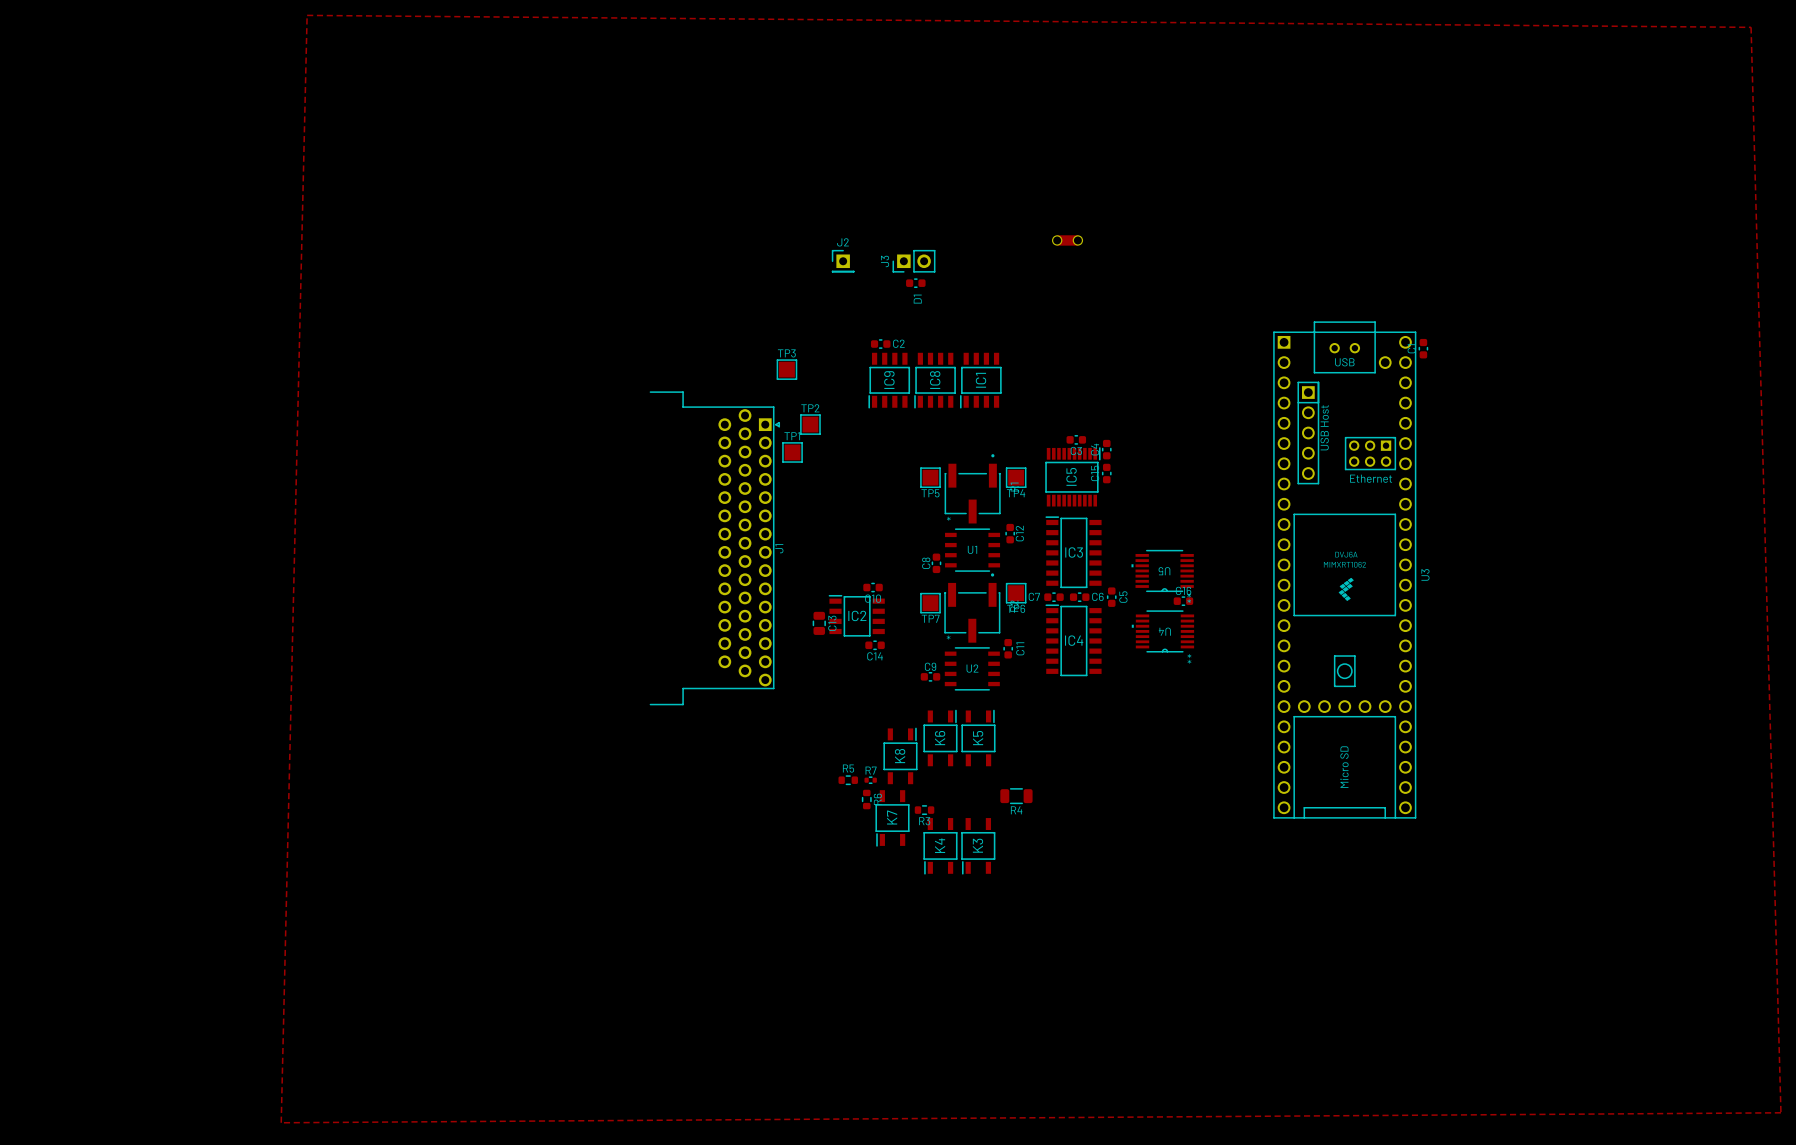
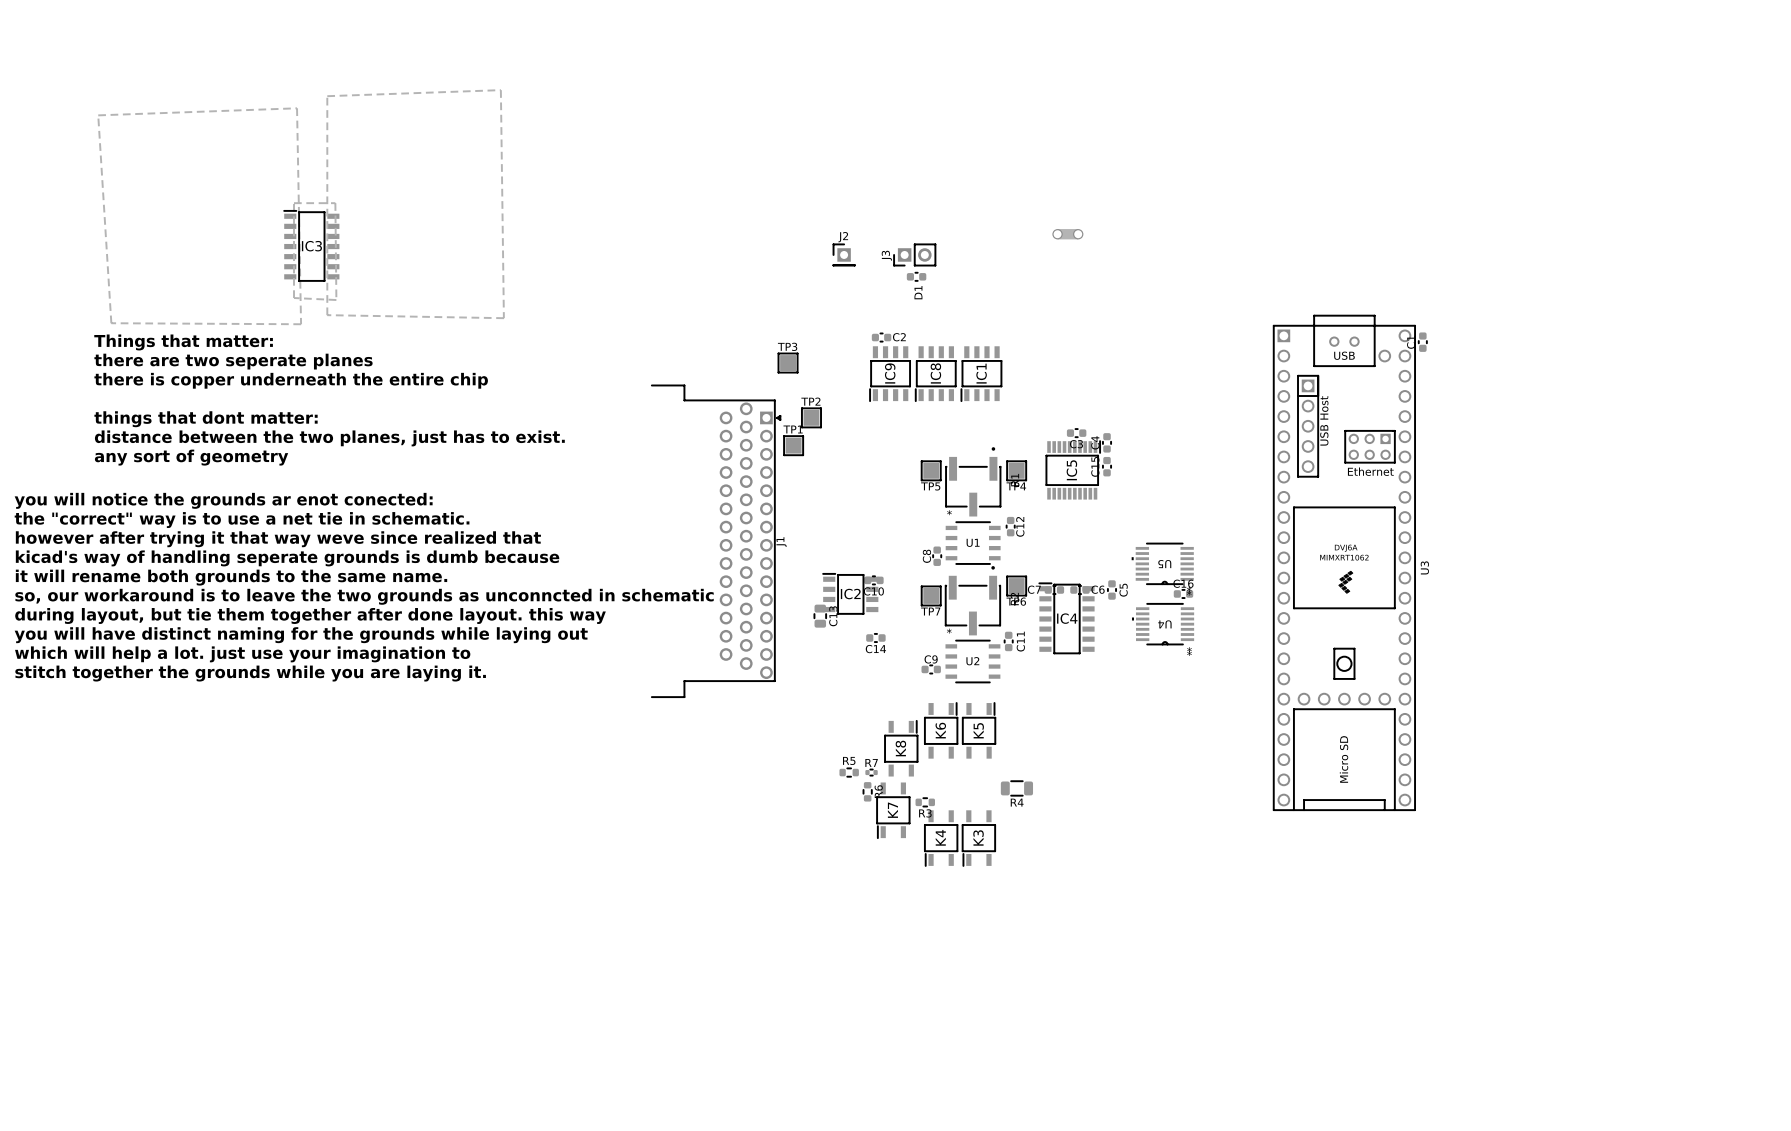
zone outline: (307, 15) (1751, 27) (1780, 1112) (281, 1122) (307, 15) -> none
zone outline: none -> (500, 90) (327, 96) (327, 315) (503, 318) (500, 90)
zone outline: none -> (297, 108) (98, 115) (111, 323) (301, 324) (297, 108)
zone outline: none -> (294, 203) (335, 203) (336, 300) (294, 298) (294, 203)
text: none -> Things that matter: (183, 342)
text: none -> there are two seperate planes (233, 361)
text: none -> there is copper underneath the entire chip (291, 380)
text: none -> things that dont matter: (206, 419)
text: none -> distance between the two planes, just has to exist. (329, 438)
text: none -> any sort of geometry (191, 457)
text: none -> you will notice the grounds ar enot conected: (223, 500)
text: none -> the "correct" way is to use a net tie in schematic. (242, 520)
text: none -> however after trying it that way weve since realized that (278, 539)
IC3 position: (1073, 552) -> (311, 245)
text: none -> kicad's way of handling seperate grounds is dumb because (287, 558)
text: none -> it will rename both grounds to the same name. (231, 577)
text: none -> so, our workaround is to leave the two grounds as unconncted in schematic (364, 596)
IC2 position: (856, 615) -> (850, 593)
text: none -> during layout, but tie them together after done layout. this way (310, 615)
IC4 position: (1073, 640) -> (1066, 618)
text: none -> you will have distinct naming for the grounds while laying out (301, 635)
text: none -> which will help a lot. just use your imagination to (242, 654)
text: none -> stitch together the grounds while you are laying it. (250, 673)

